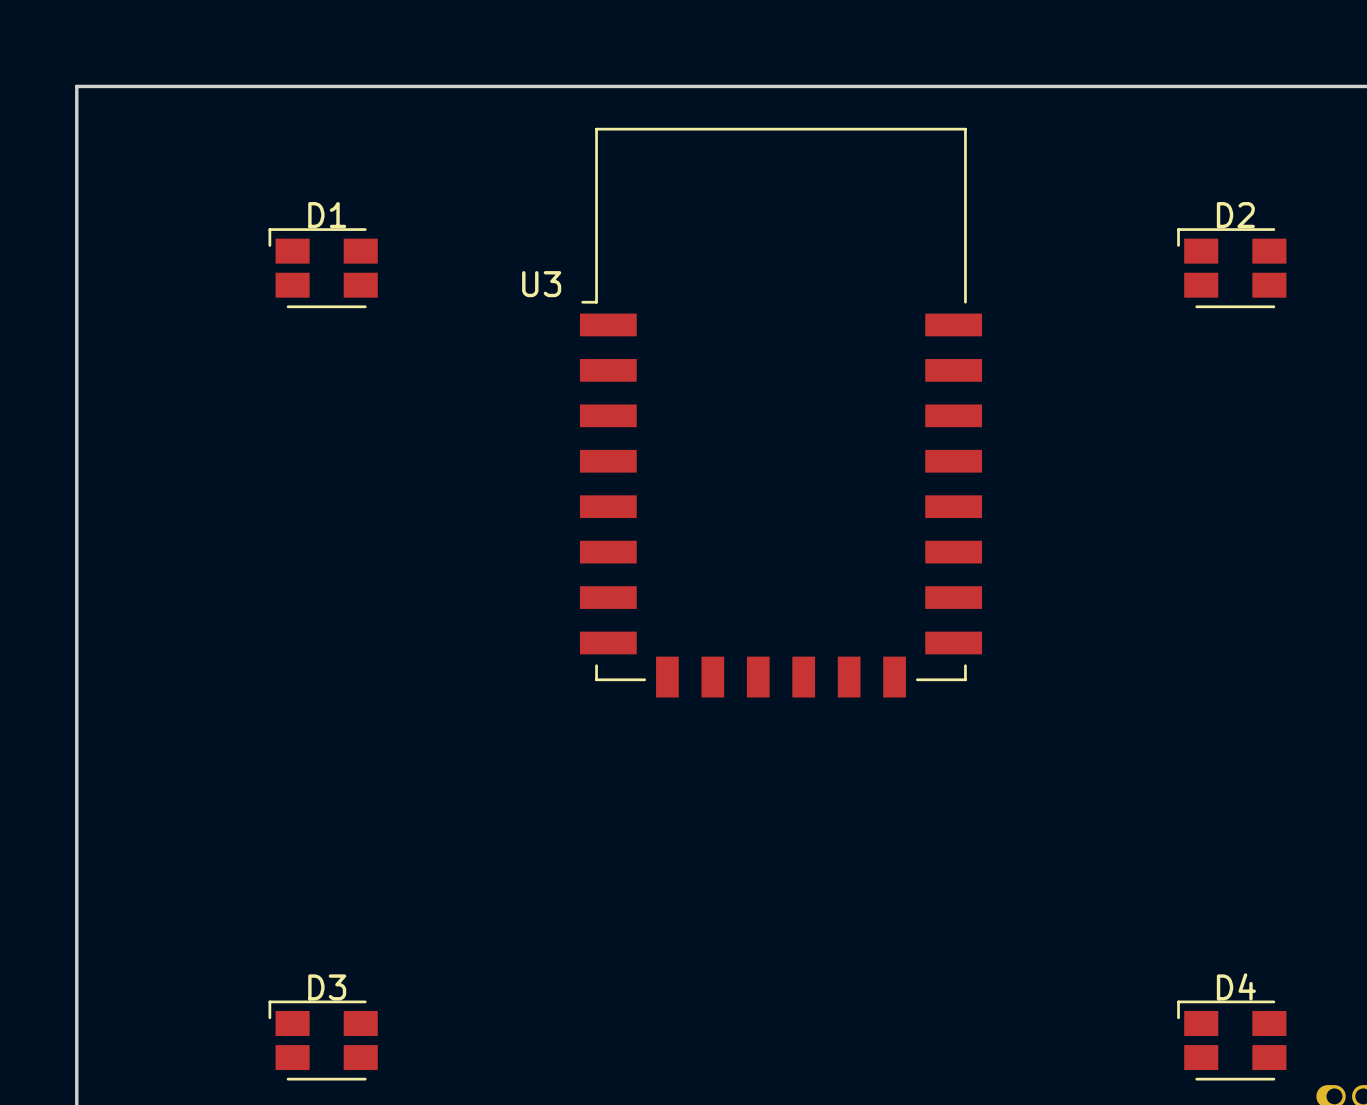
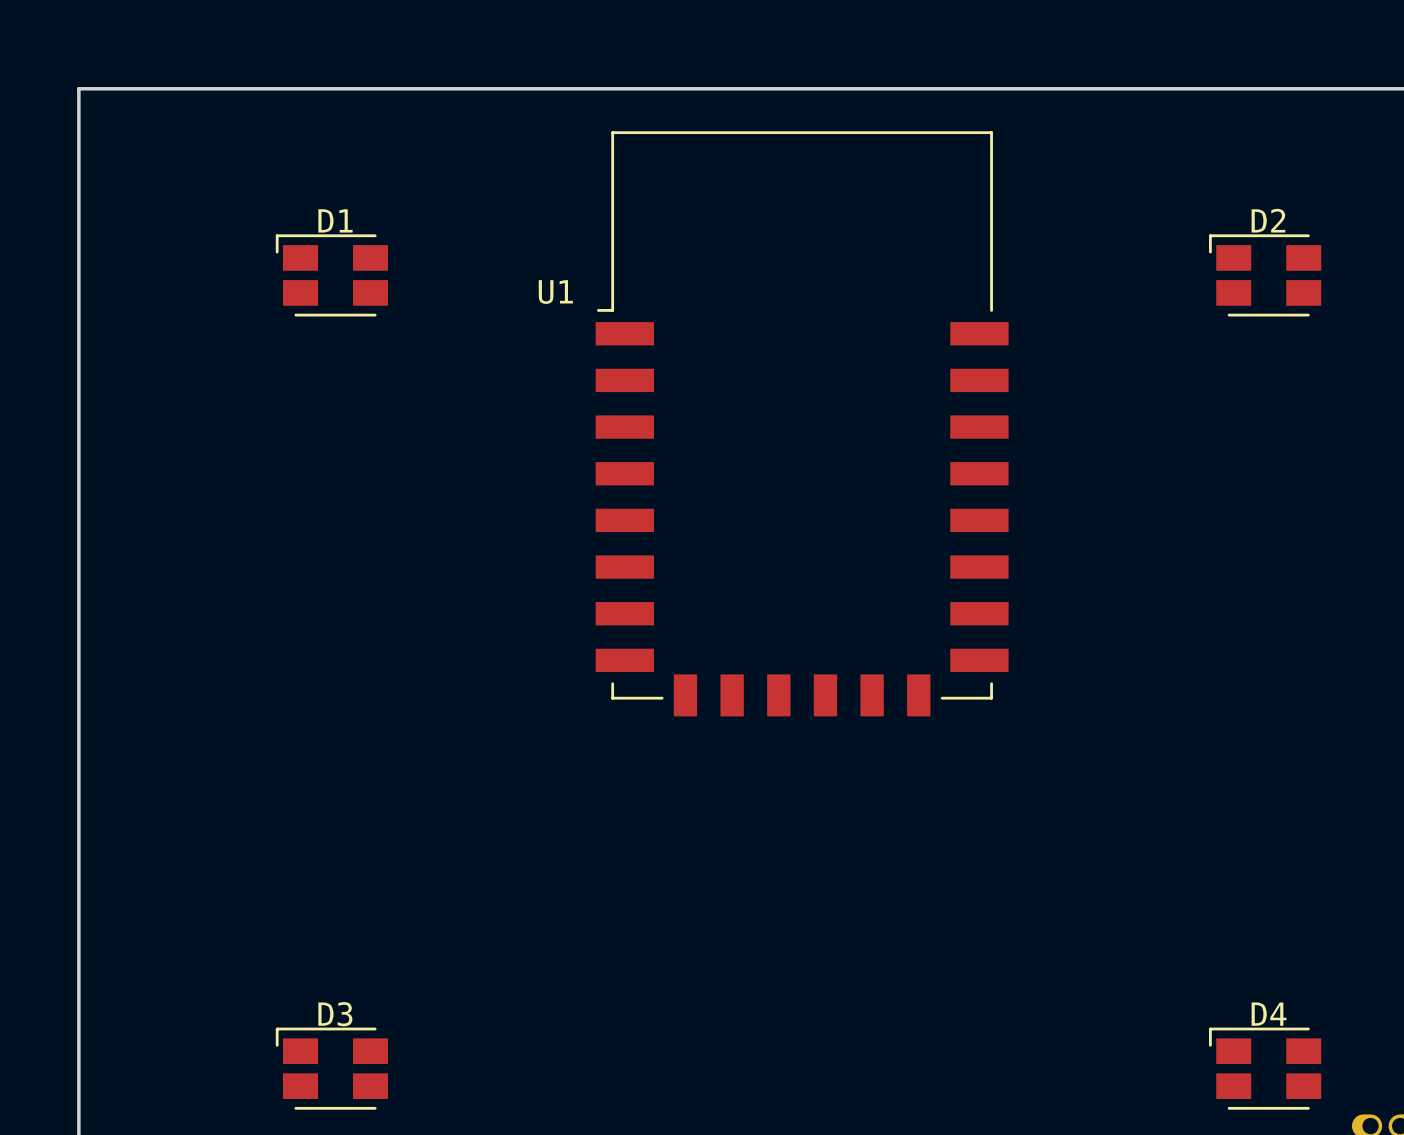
U3 name: U3 (541, 284) -> U1 (555, 292)

